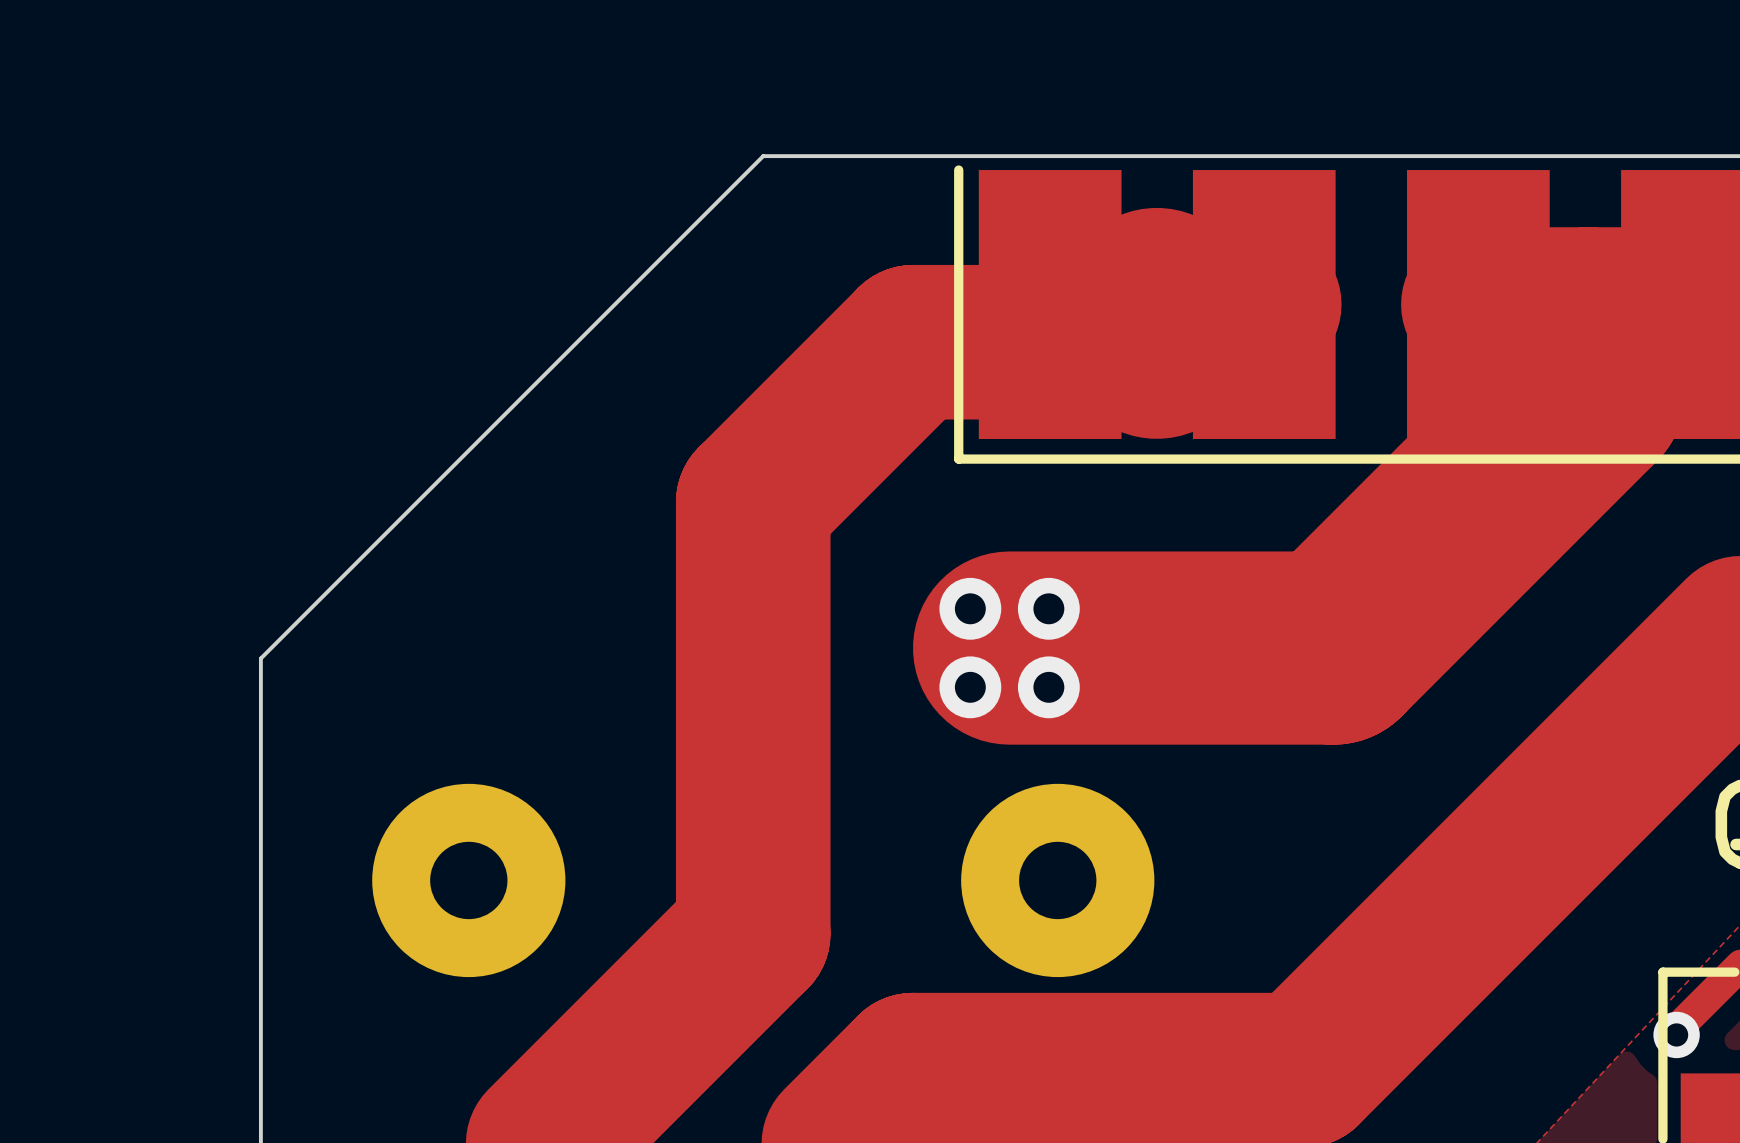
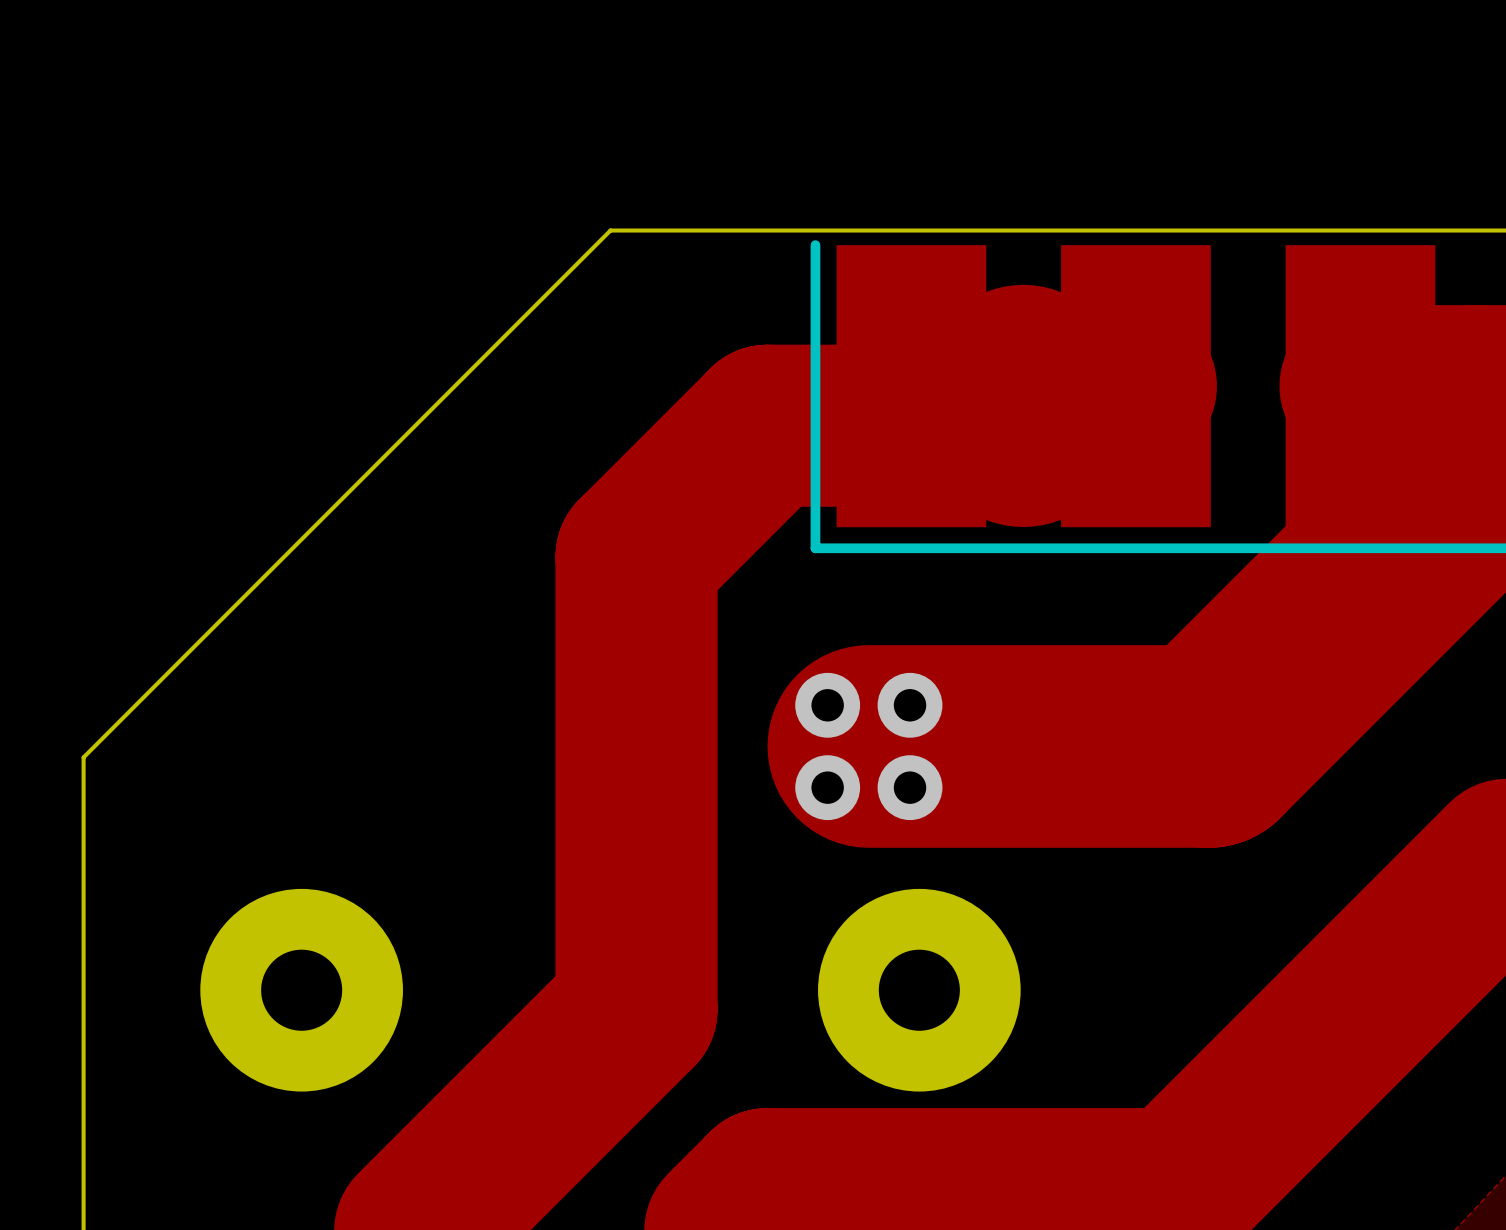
track: (788, 467) (753, 501) (753, 933) -> (636, 556) (636, 1009) (599, 1046)

